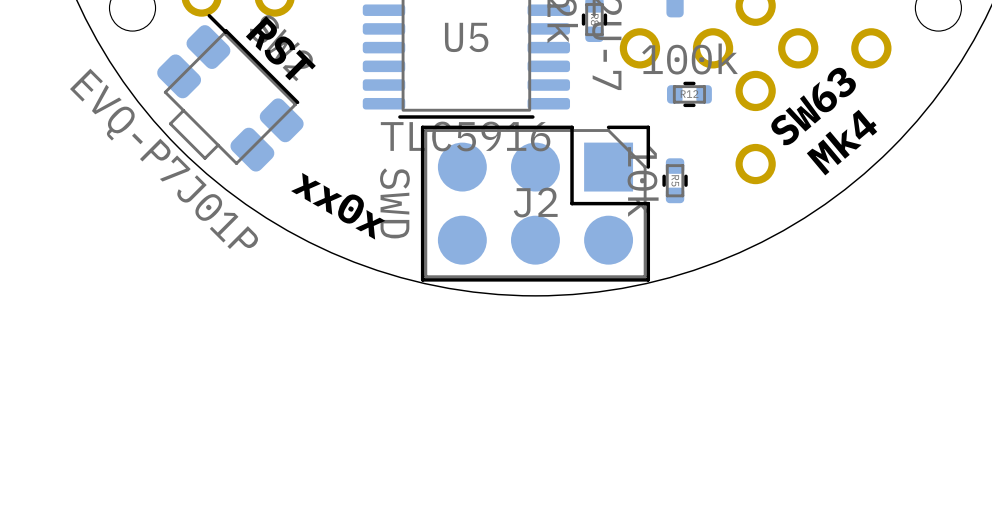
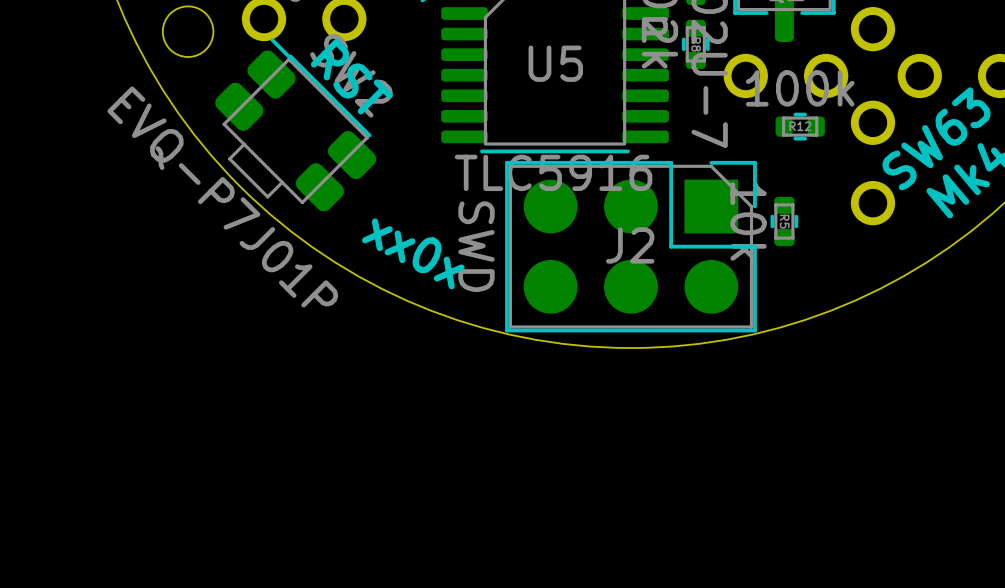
text rotation: 0° (338, 206) -> 2° counterclockwise (413, 253)

